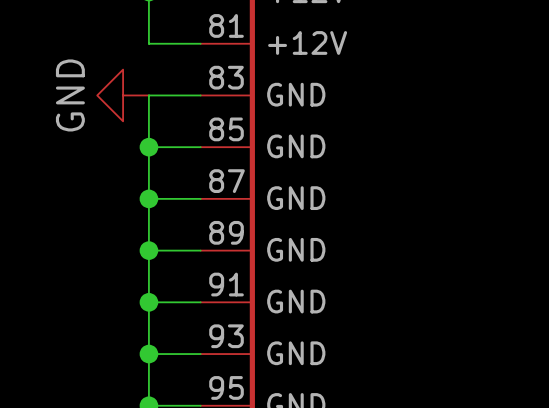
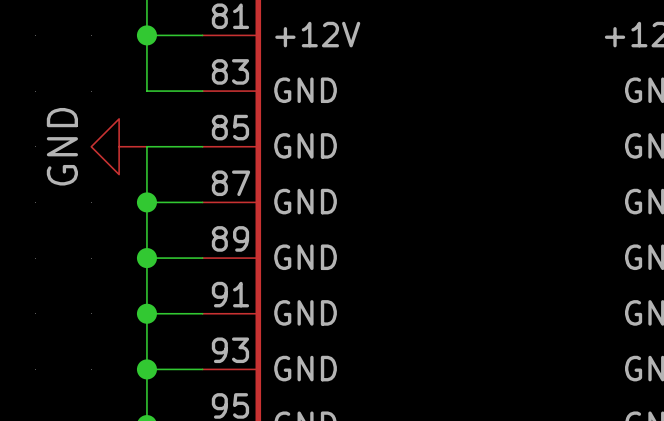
junction: none -> (146, 35)
power symbol position: GND (123, 95) -> GND (119, 146)
wire: (148, 95) (148, 147) -> (146, 91) (146, 35)
junction: (148, 147) -> none

